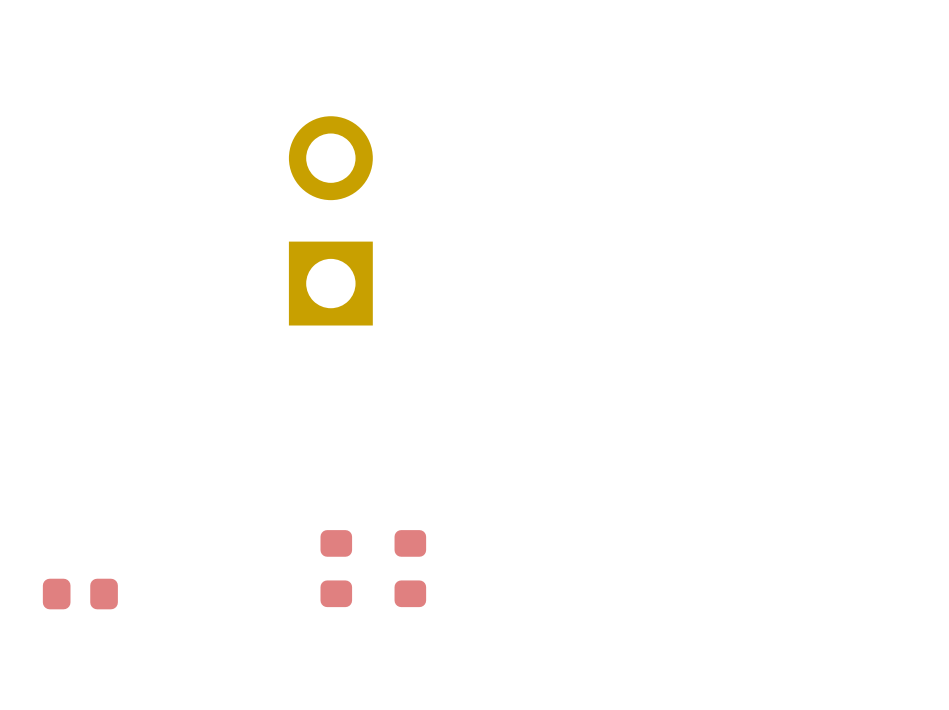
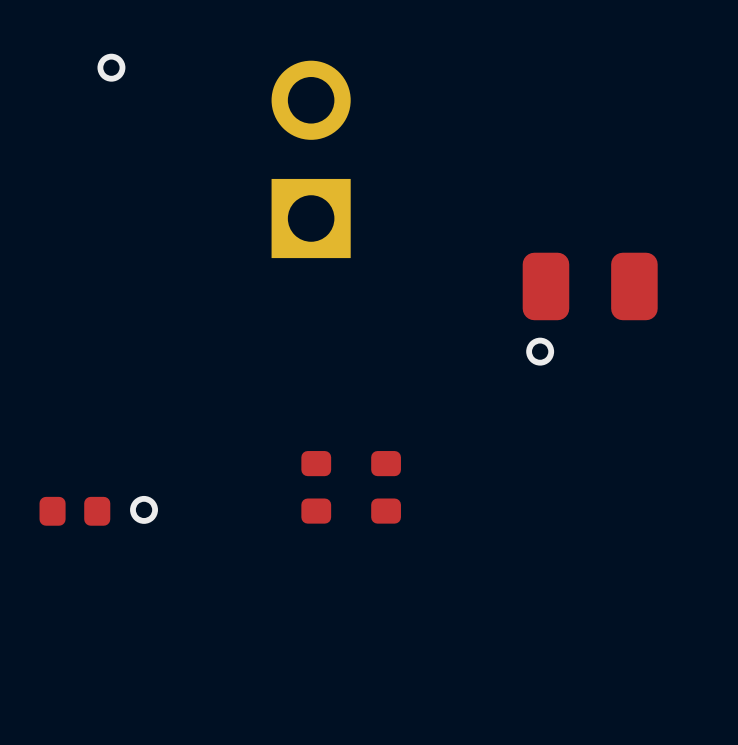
via: none -> (111, 67)
part: none -> (590, 286)
via: none -> (540, 351)
via: none -> (144, 509)

